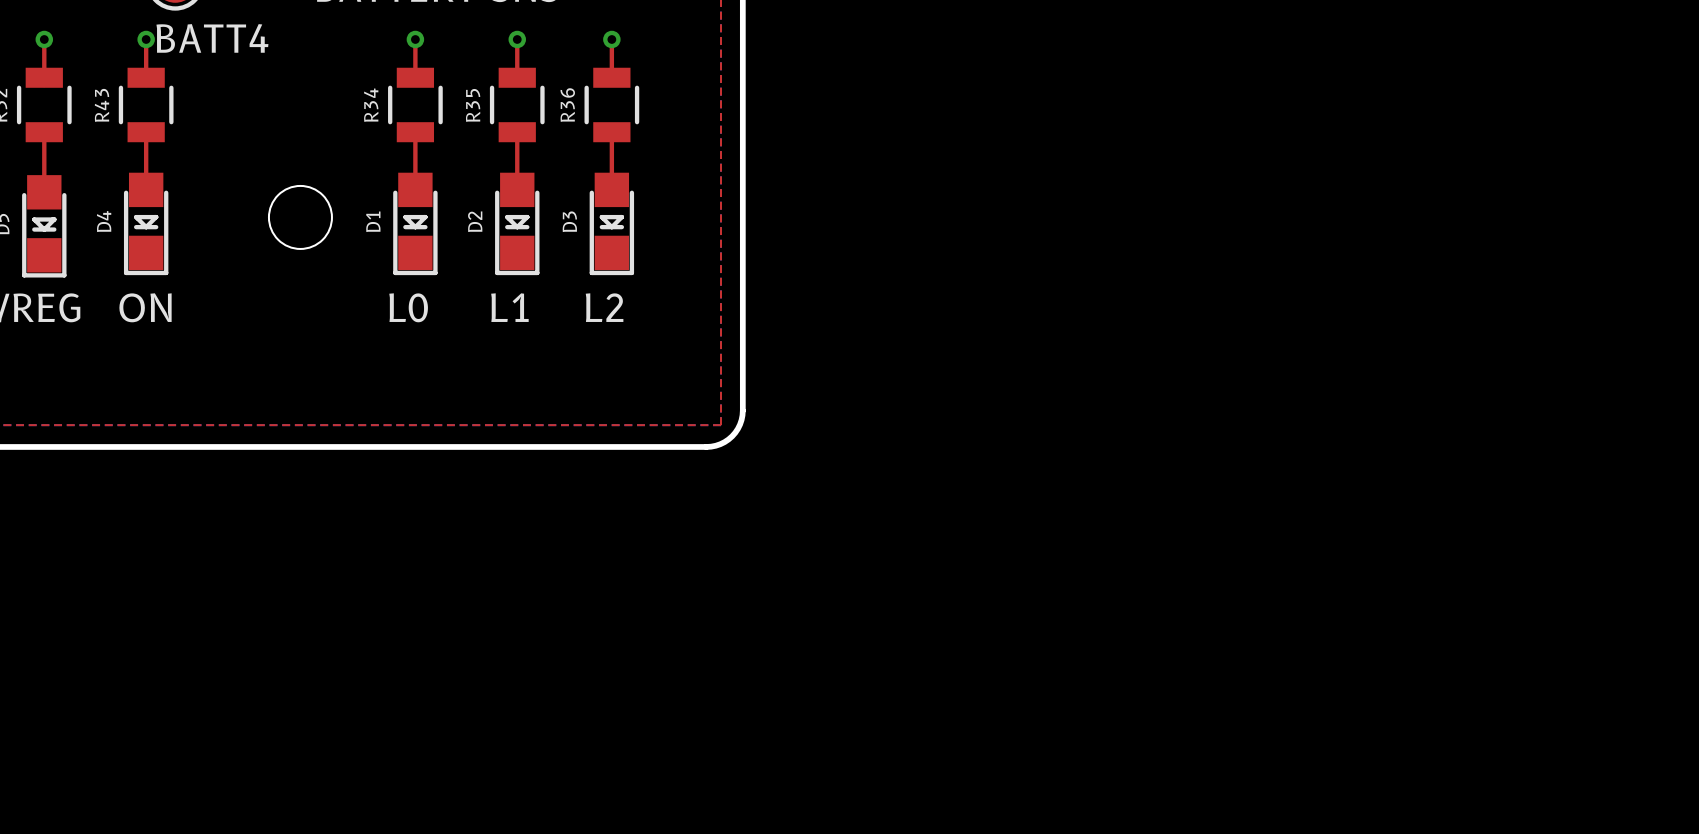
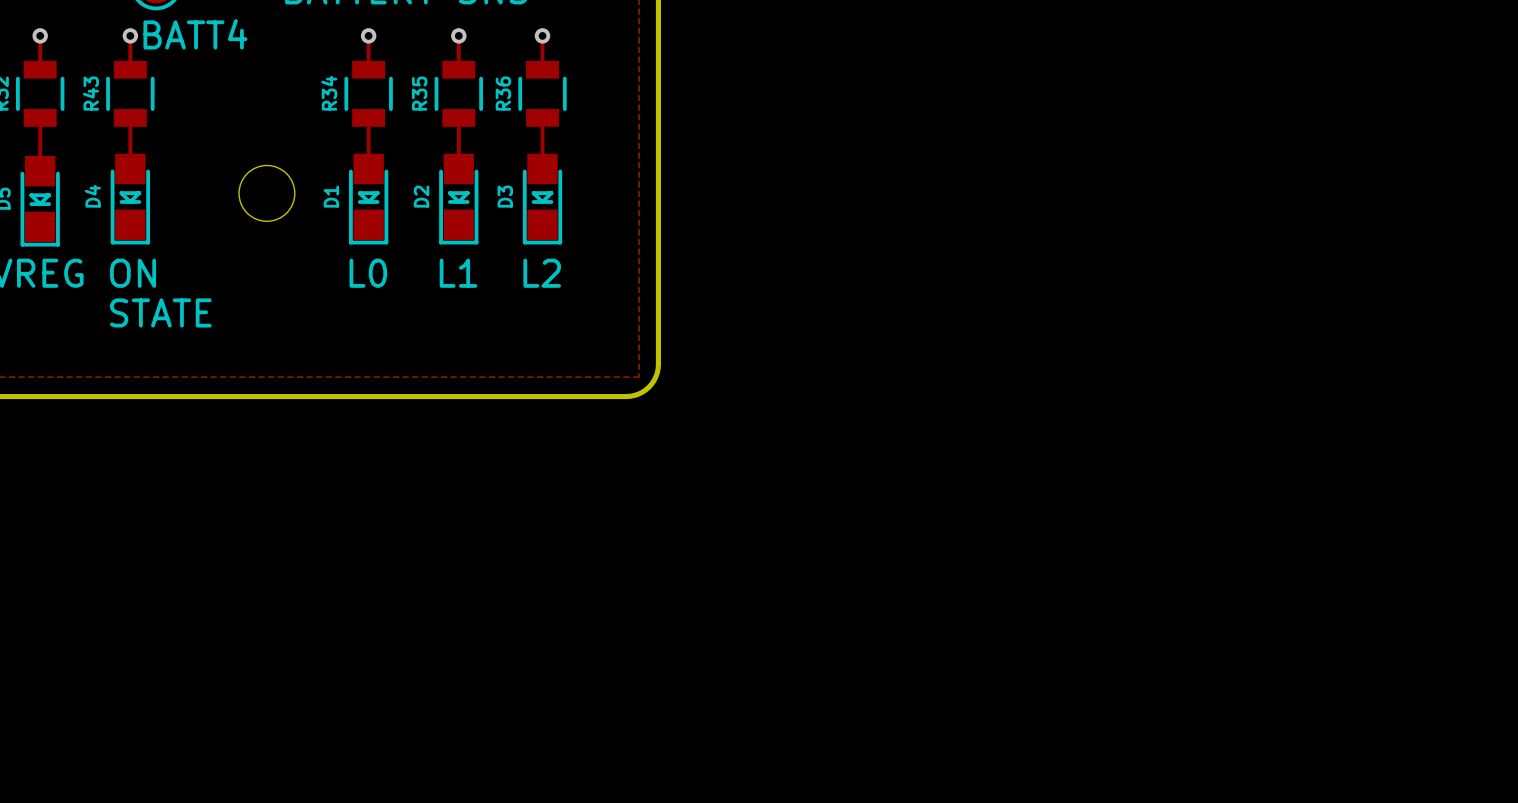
text: none -> STATE (160, 312)

